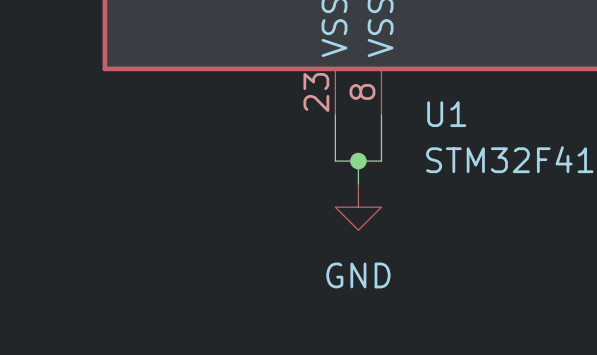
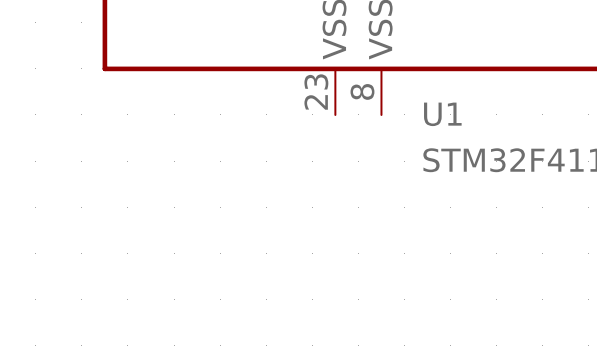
wire: (335, 114) (335, 161) (381, 161) (381, 114) -> none
wire: (358, 161) (358, 184) -> none
junction: (358, 161) -> none
power symbol: GND (358, 207) -> none

